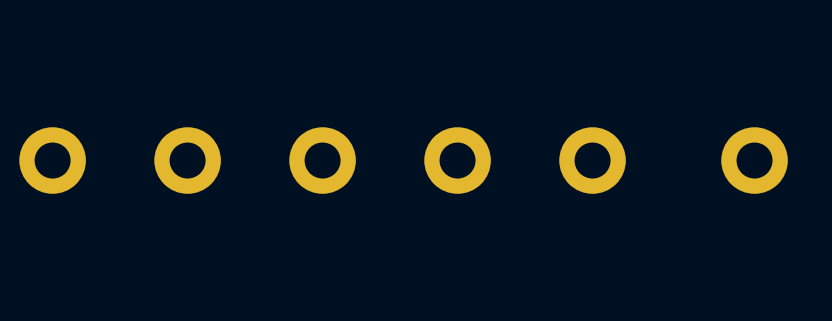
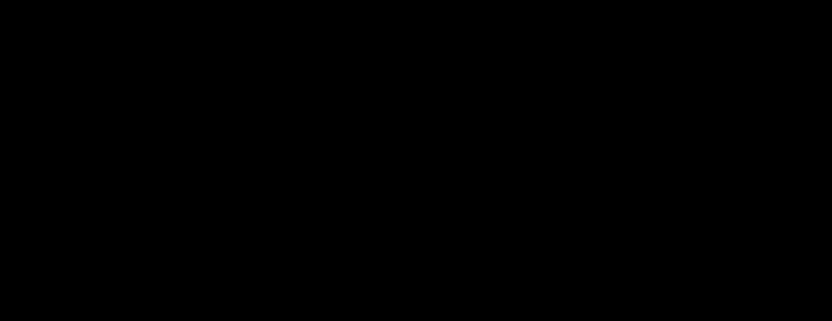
part: (52, 160) -> none
part: (187, 160) -> none
part: (322, 160) -> none
part: (457, 160) -> none
part: (592, 160) -> none
part: (754, 160) -> none

